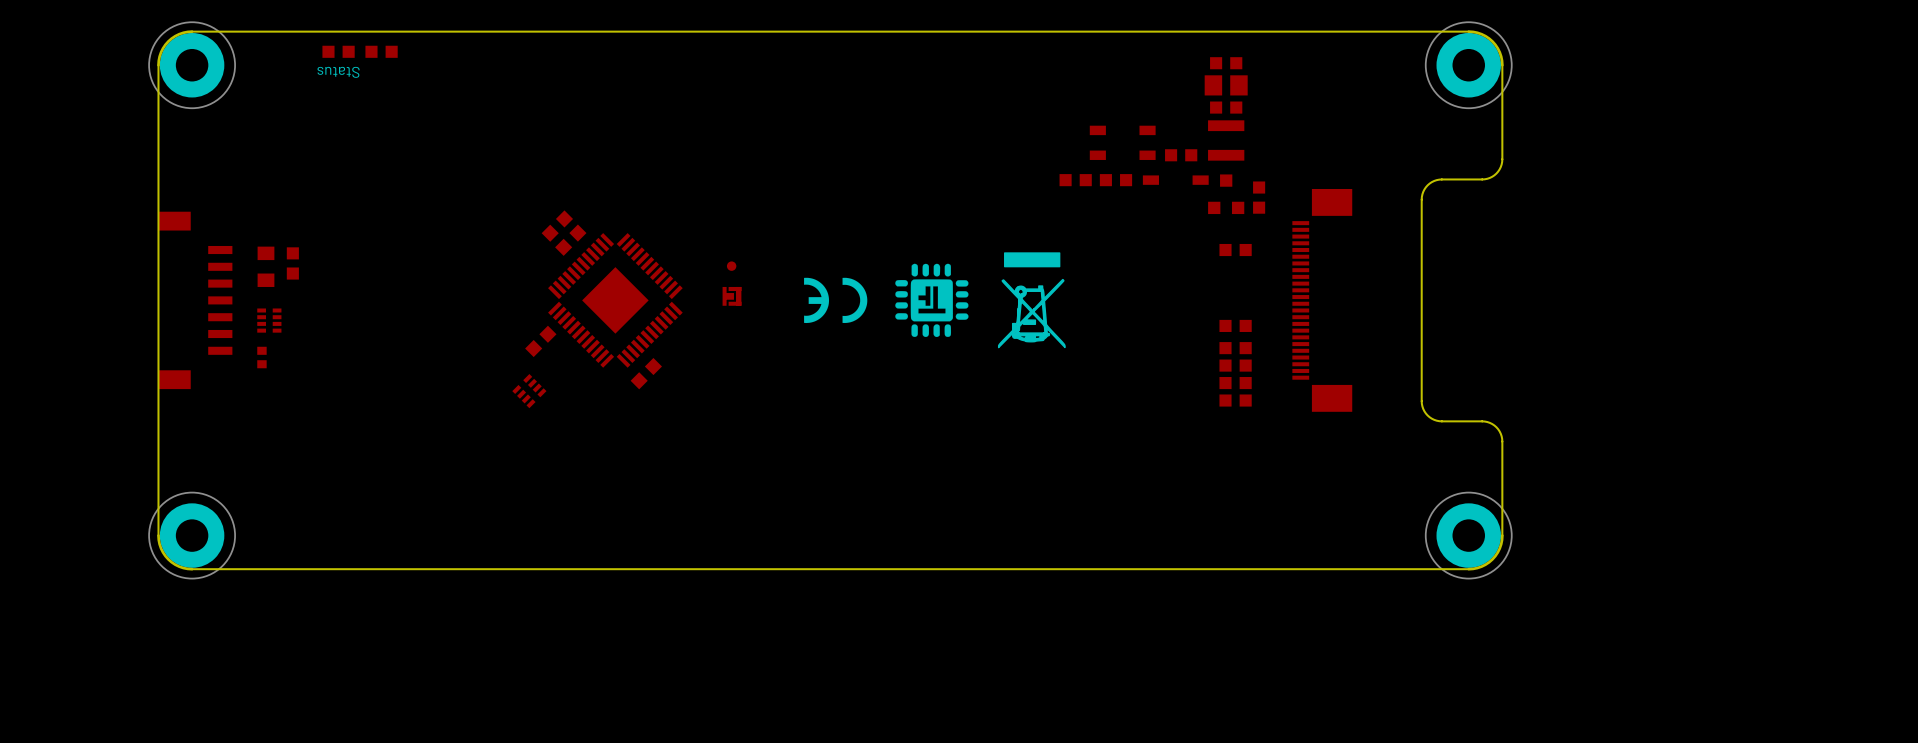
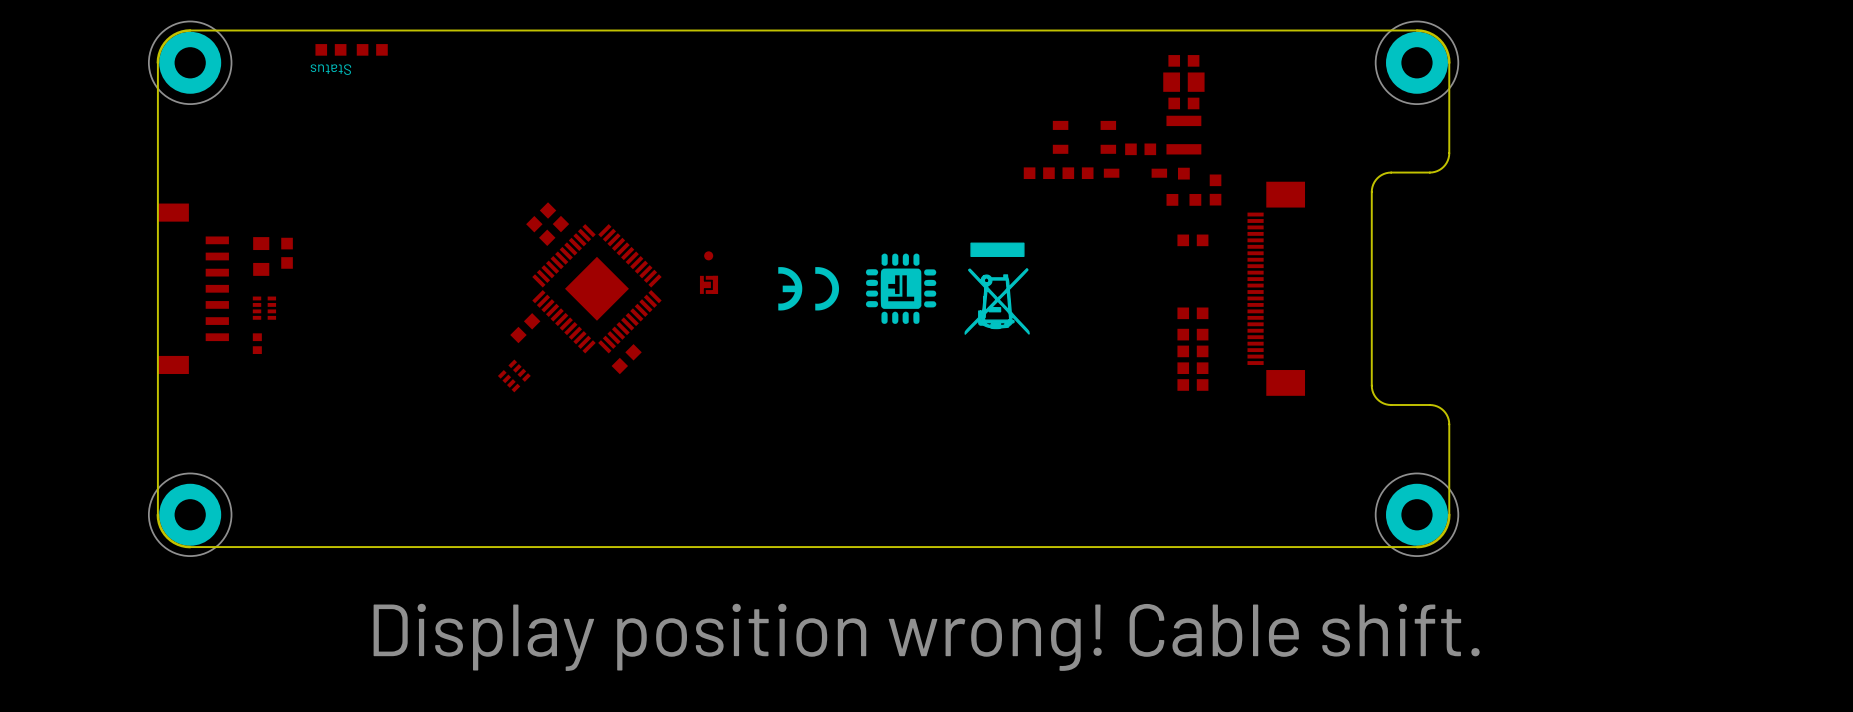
text: none -> Display position wrong! Cable shift. (926, 637)

